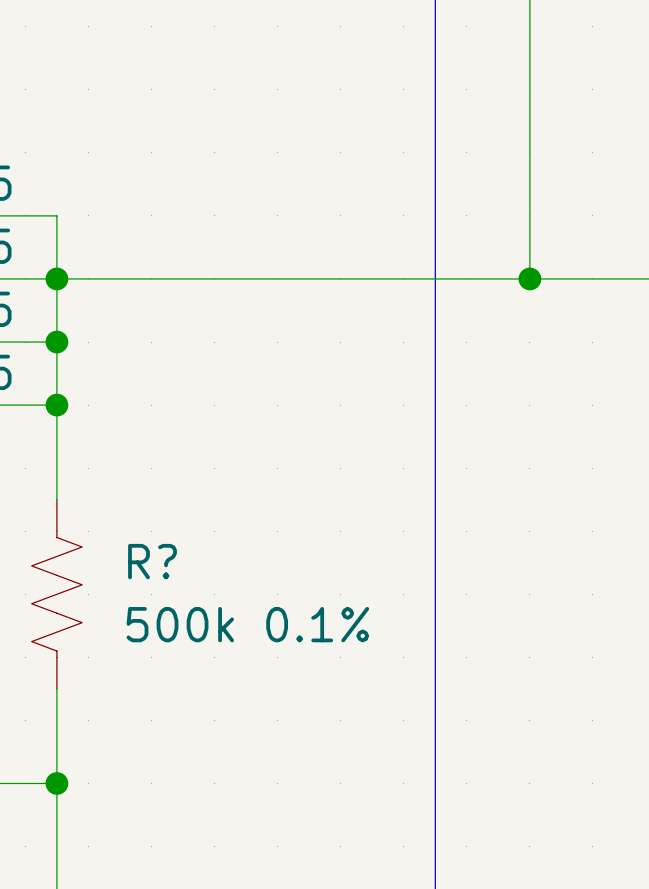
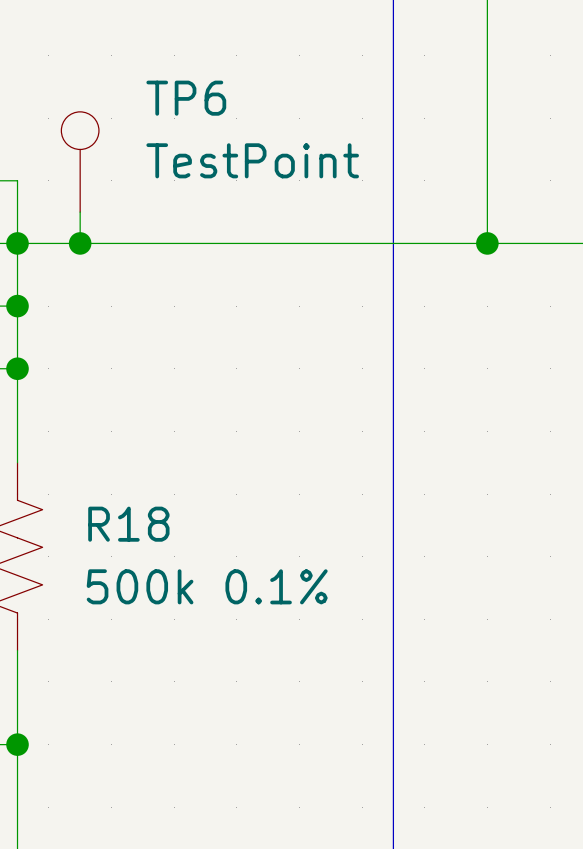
TP6: none -> TestPoint (80, 161)
wire: none -> (80, 212) (80, 243)
junction: none -> (80, 243)
R? name: R? (152, 561) -> R18 (128, 524)

